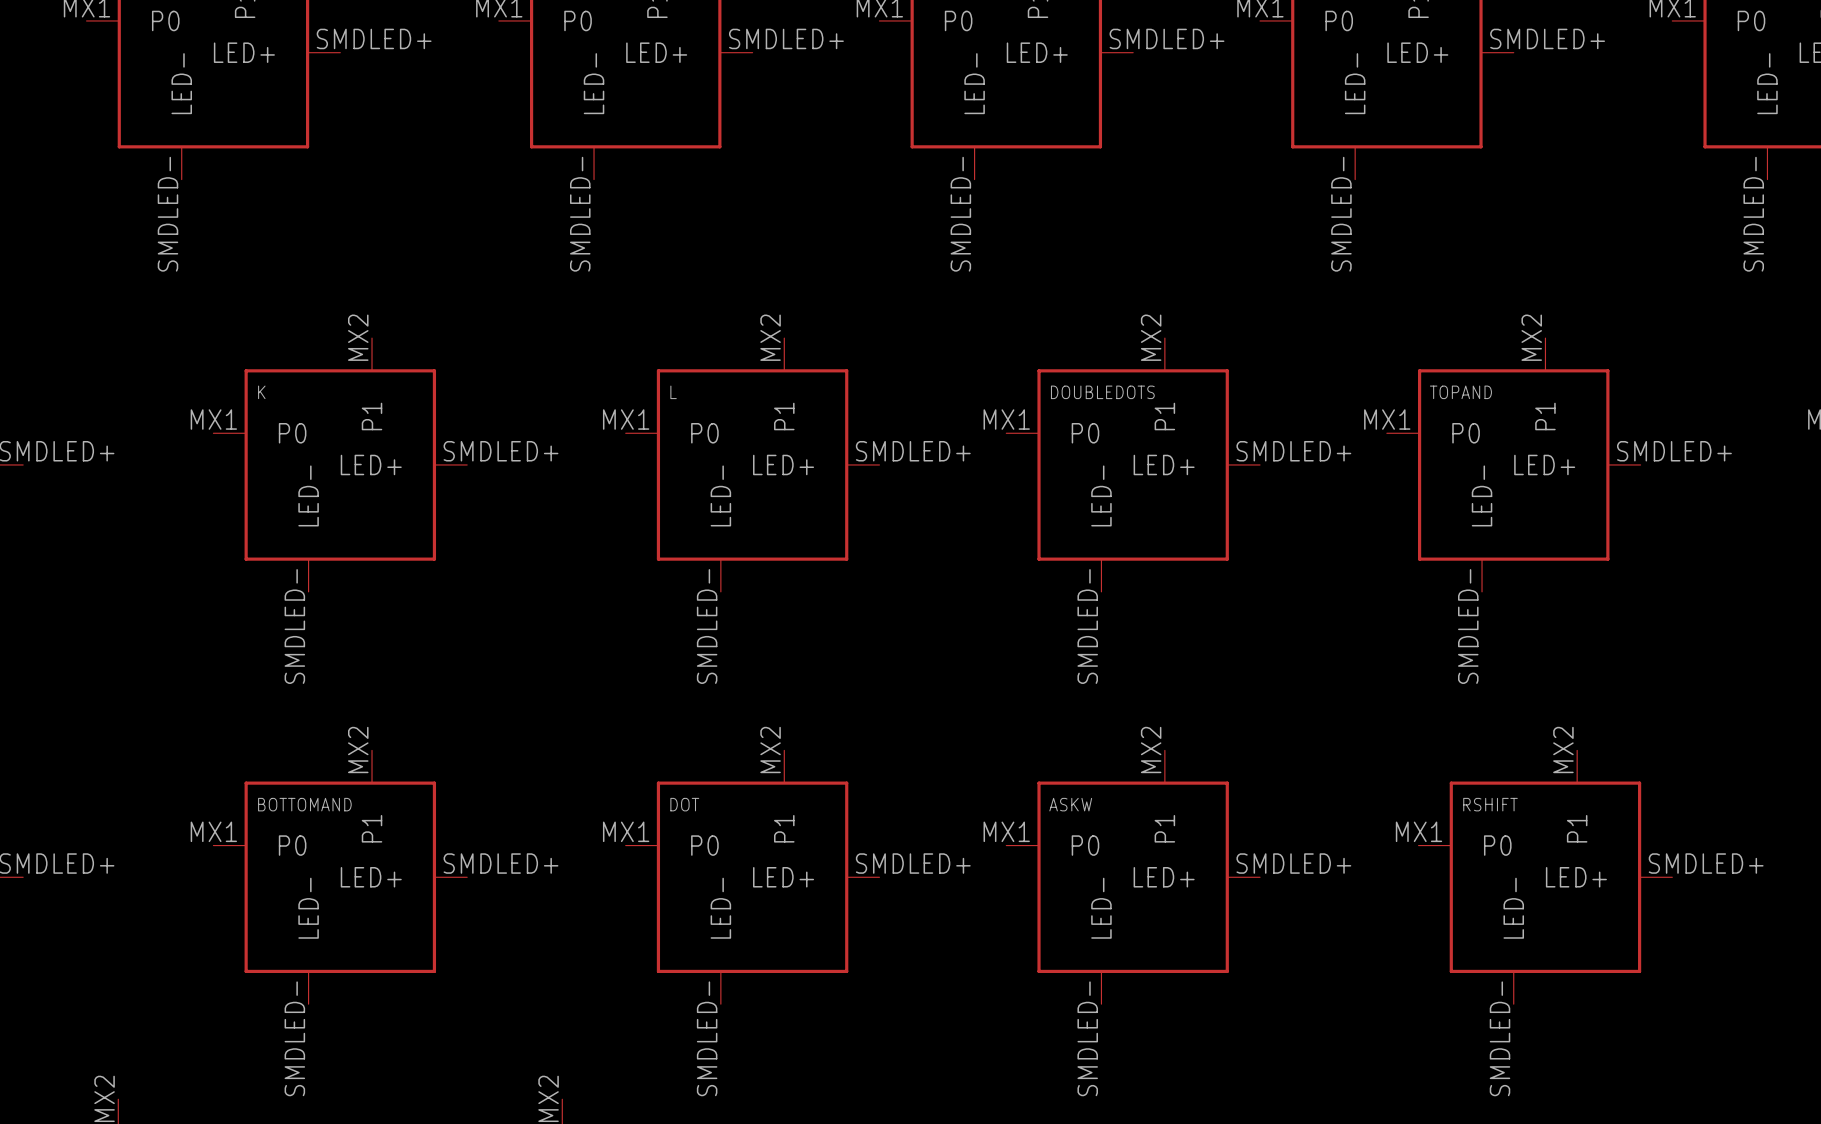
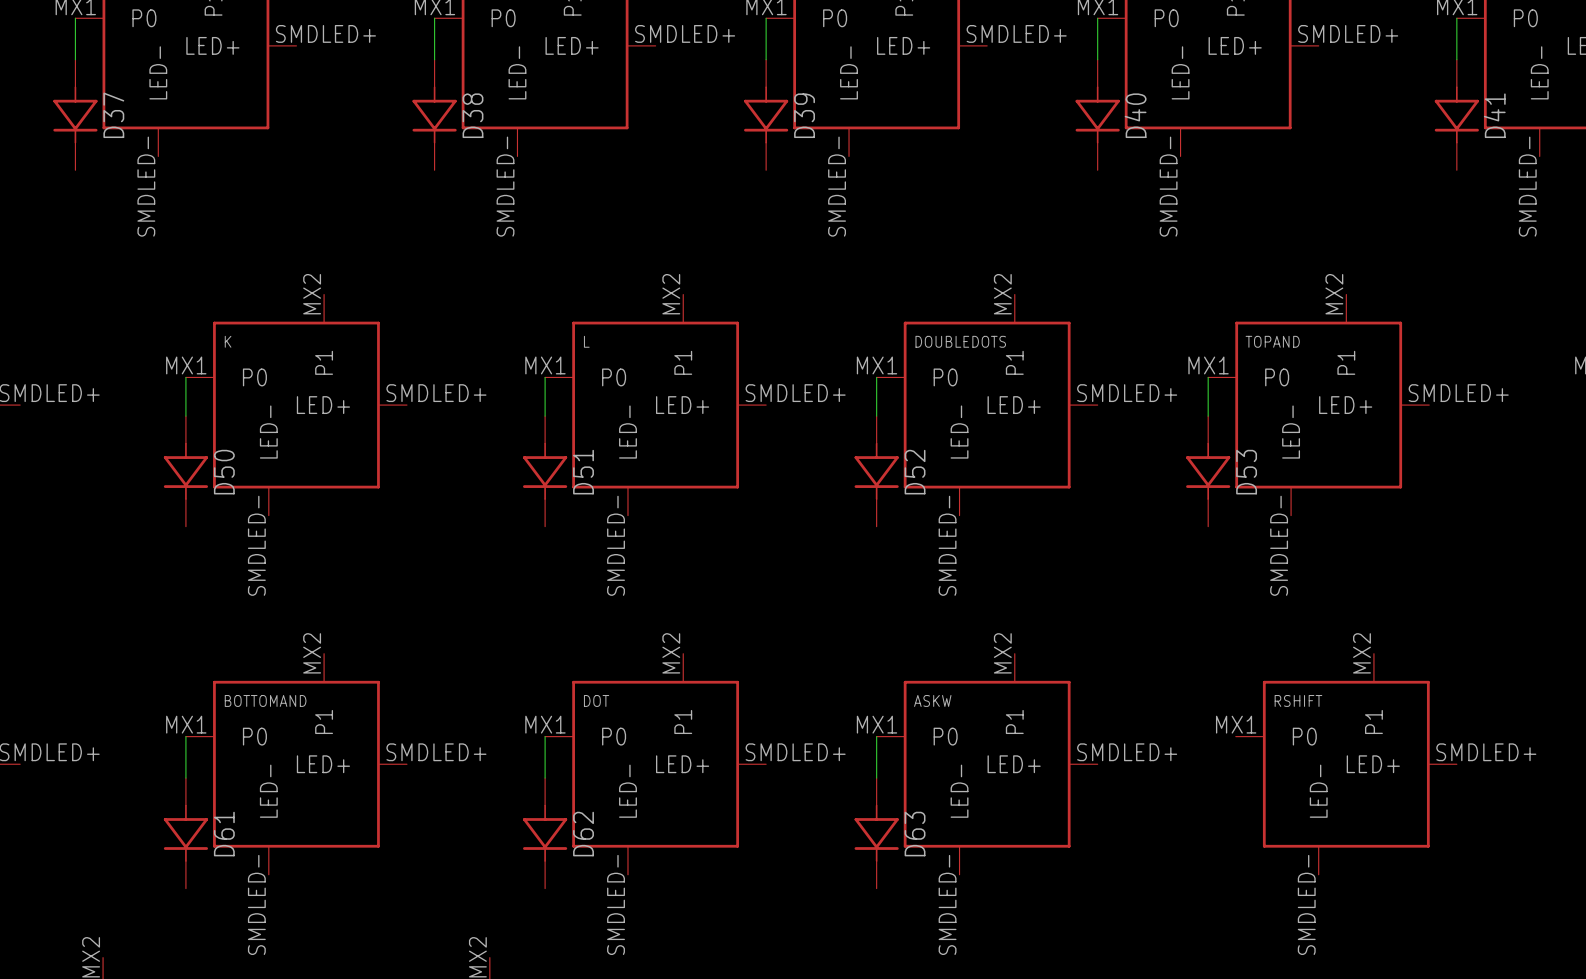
wire: none -> (75, 18) (75, 59)
wire: none -> (434, 18) (434, 59)
wire: none -> (766, 18) (766, 59)
wire: none -> (1097, 18) (1097, 59)
wire: none -> (1456, 18) (1456, 59)
D37: none -> (75, 114)
D38: none -> (434, 114)
D39: none -> (766, 114)
D40: none -> (1097, 114)
D41: none -> (1456, 114)
wire: none -> (185, 377) (185, 416)
wire: none -> (545, 377) (545, 416)
wire: none -> (876, 377) (876, 416)
wire: none -> (1208, 377) (1208, 416)
D50: none -> (185, 471)
D51: none -> (545, 471)
D52: none -> (876, 471)
D53: none -> (1208, 471)
wire: none -> (185, 736) (185, 778)
wire: none -> (545, 736) (545, 778)
wire: none -> (876, 736) (876, 778)
D61: none -> (185, 833)
D62: none -> (545, 833)
D63: none -> (876, 833)

